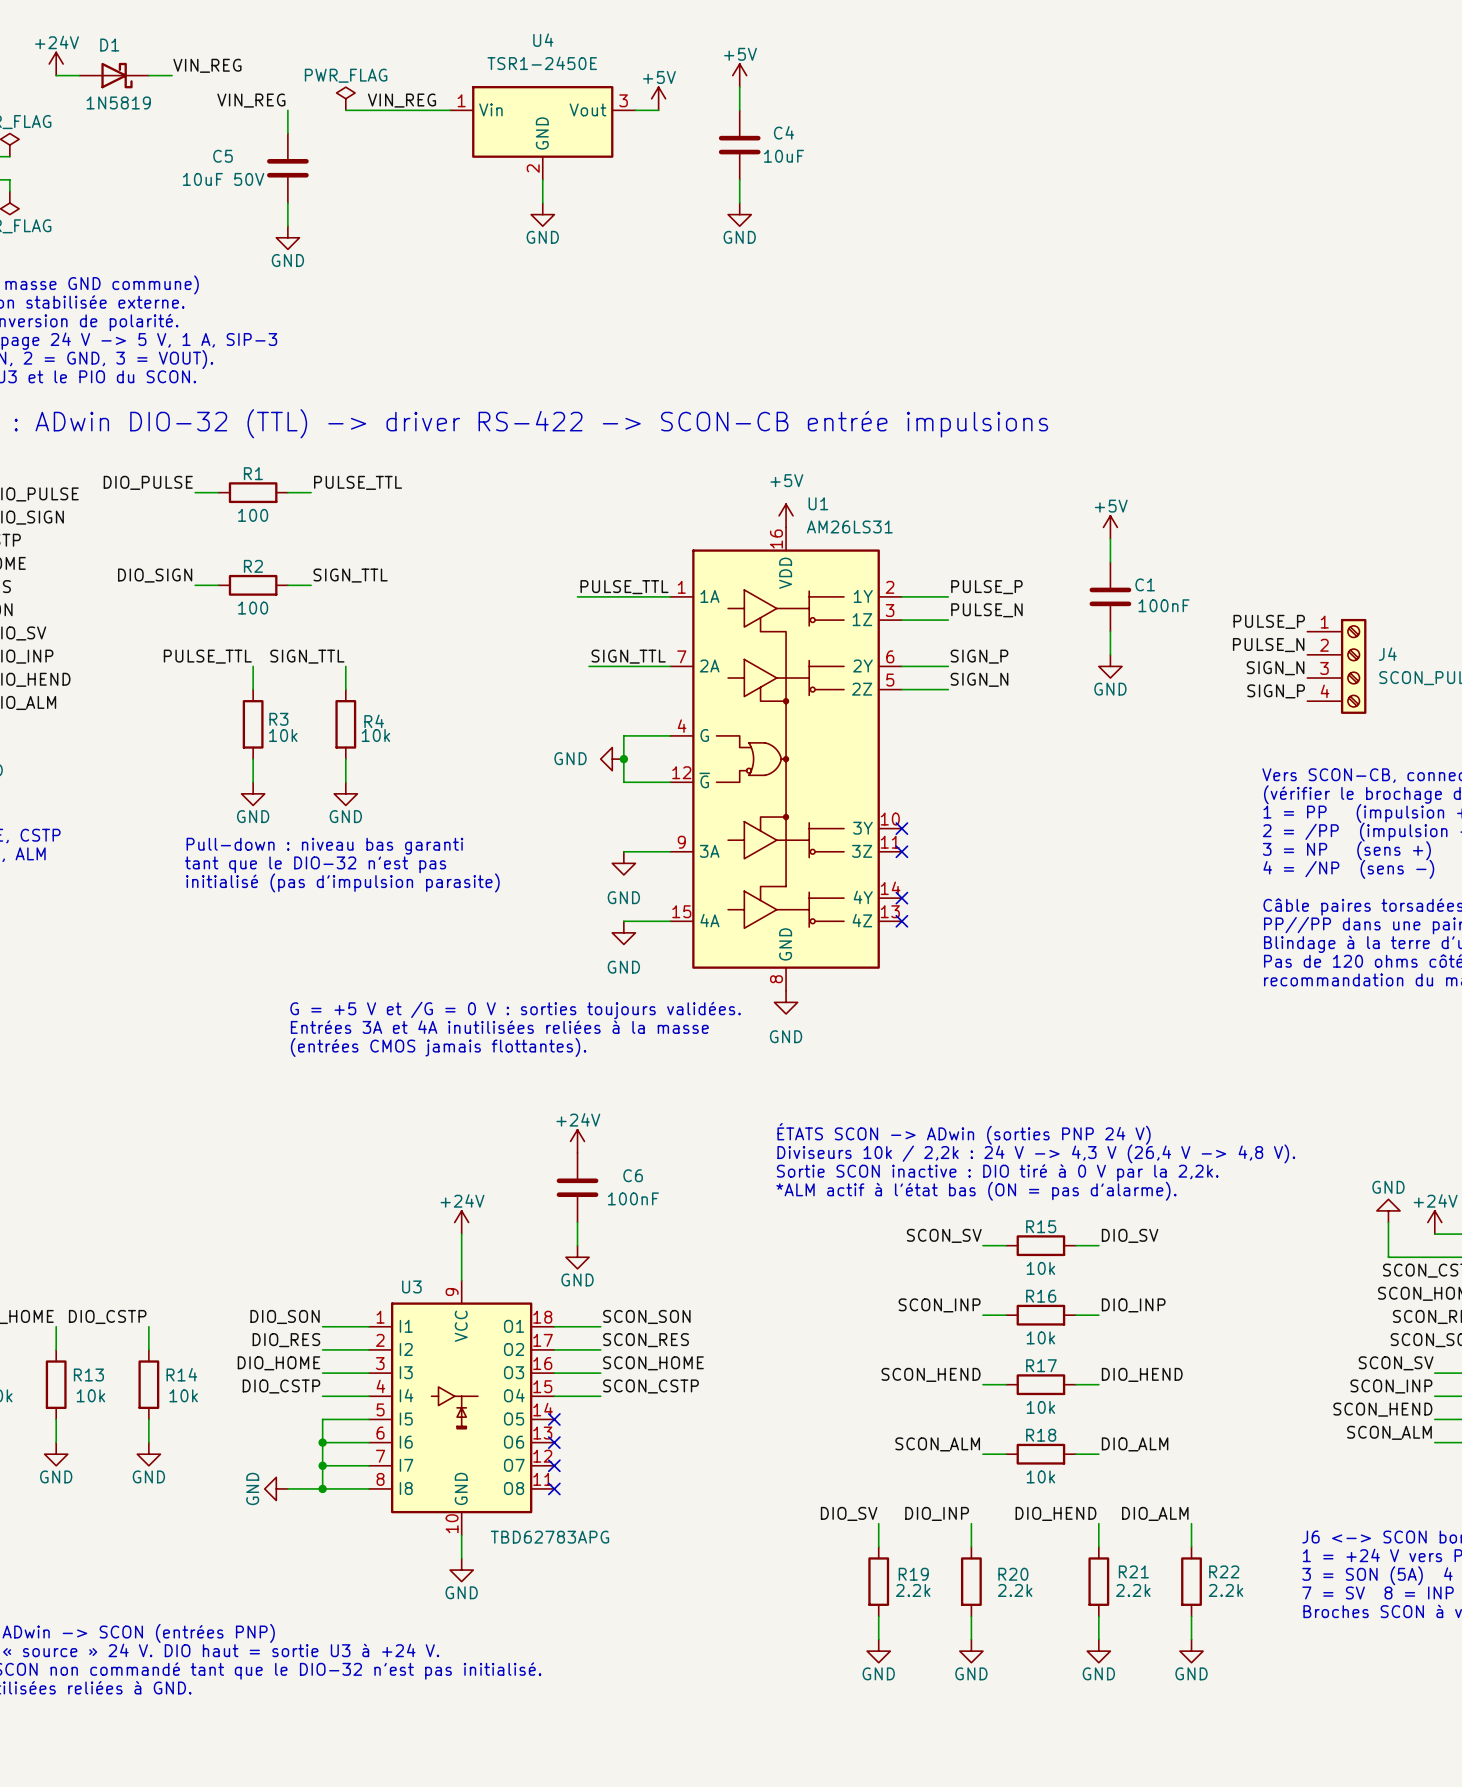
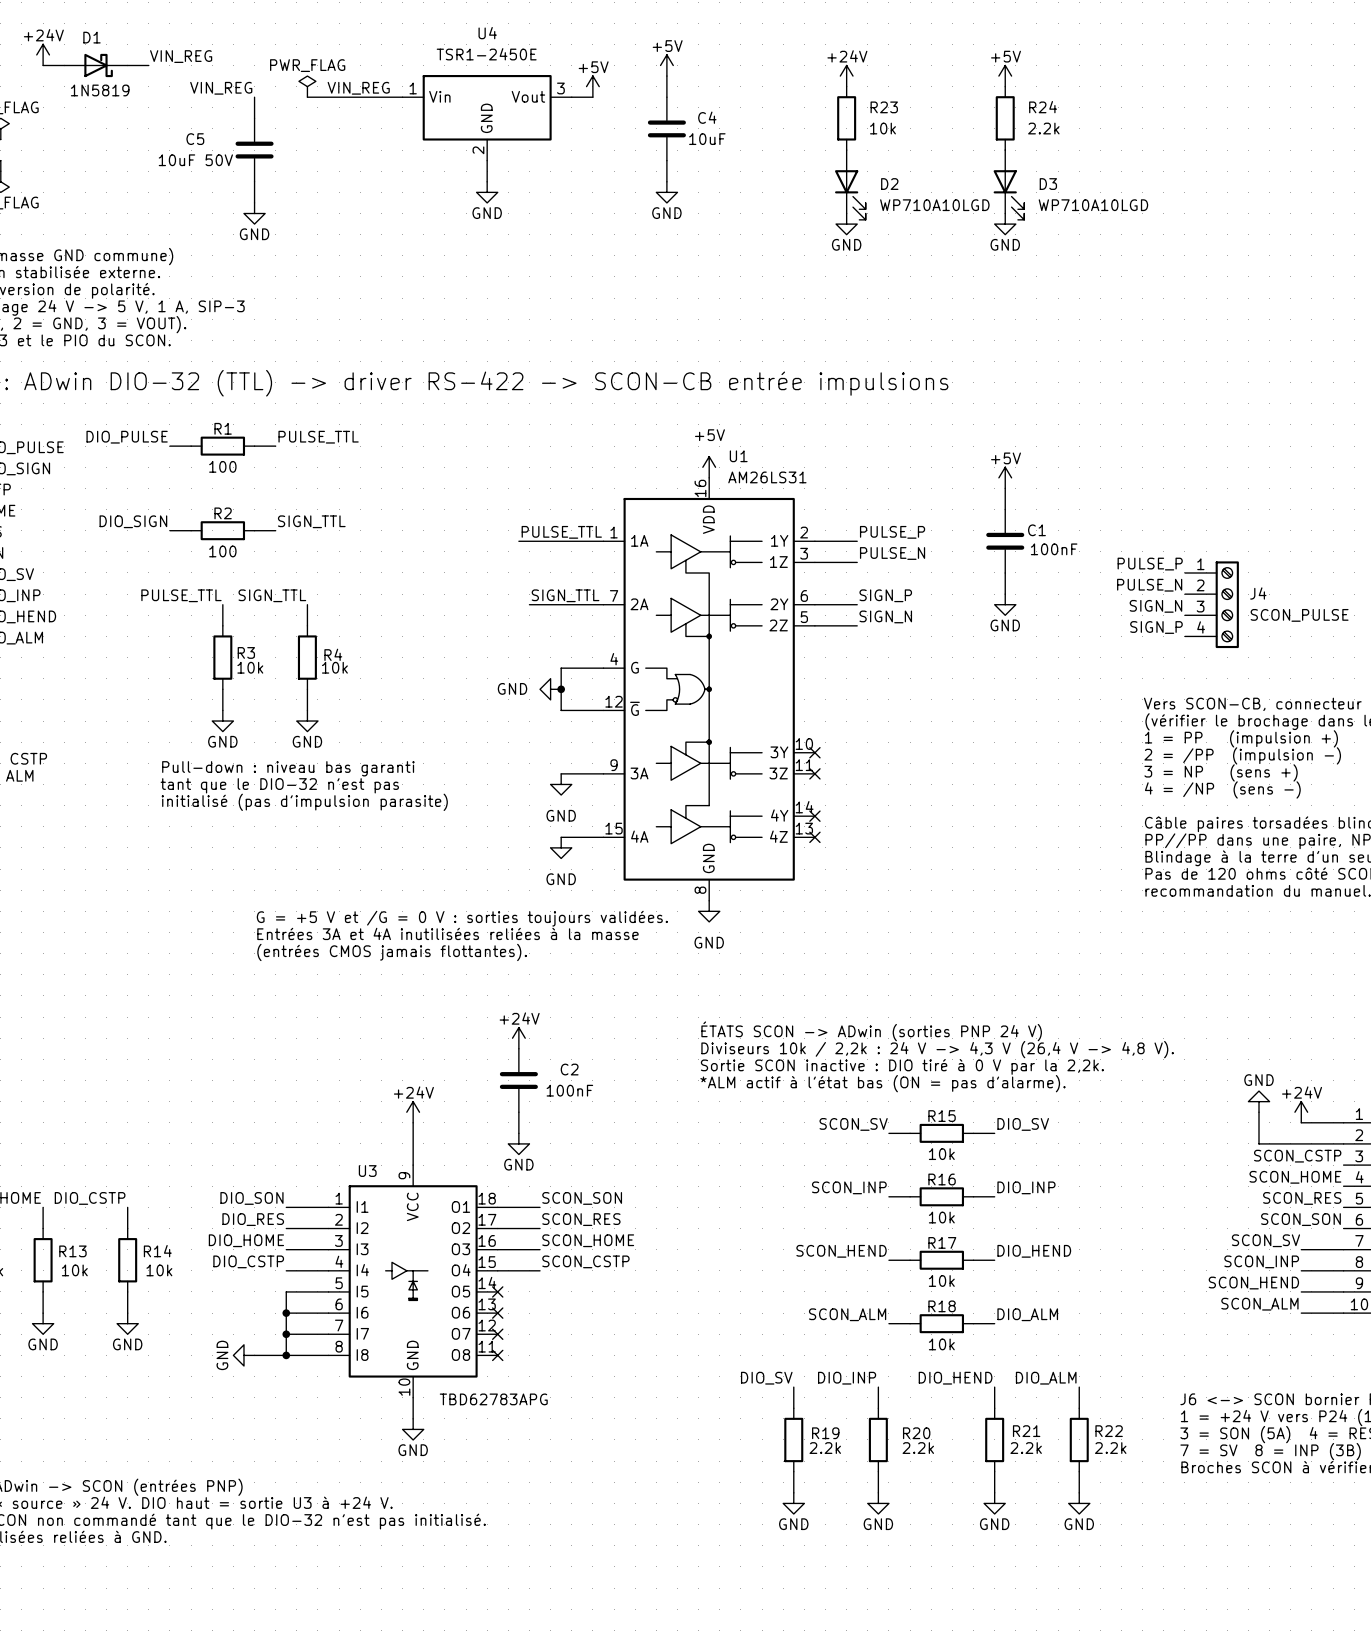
power symbol: none -> +24V (846, 76)
power symbol: none -> +5V (1005, 76)
R23: none -> 10k (846, 118)
R24: none -> 2.2k (1005, 118)
D2: none -> WP710A10LGD (850, 184)
D3: none -> WP710A10LGD (1008, 184)
power symbol: none -> GND (846, 224)
power symbol: none -> GND (1005, 224)
C6 name: C6 (633, 1175) -> C2 (569, 1069)

